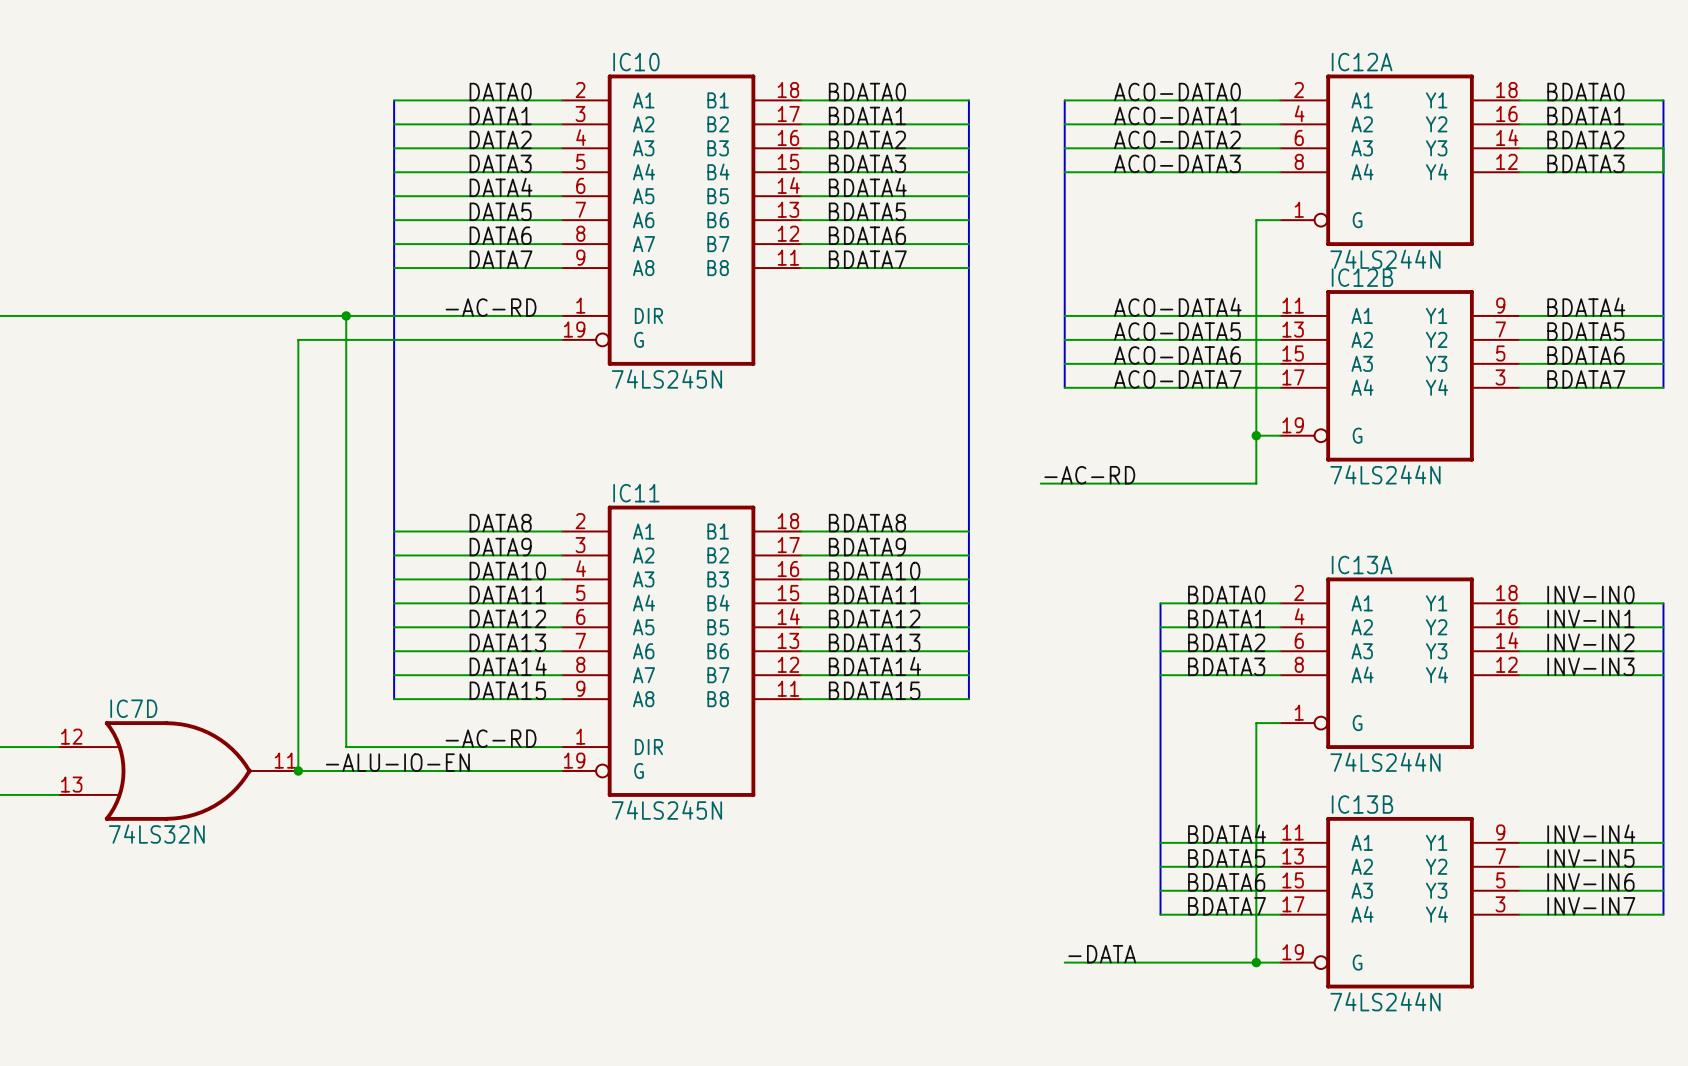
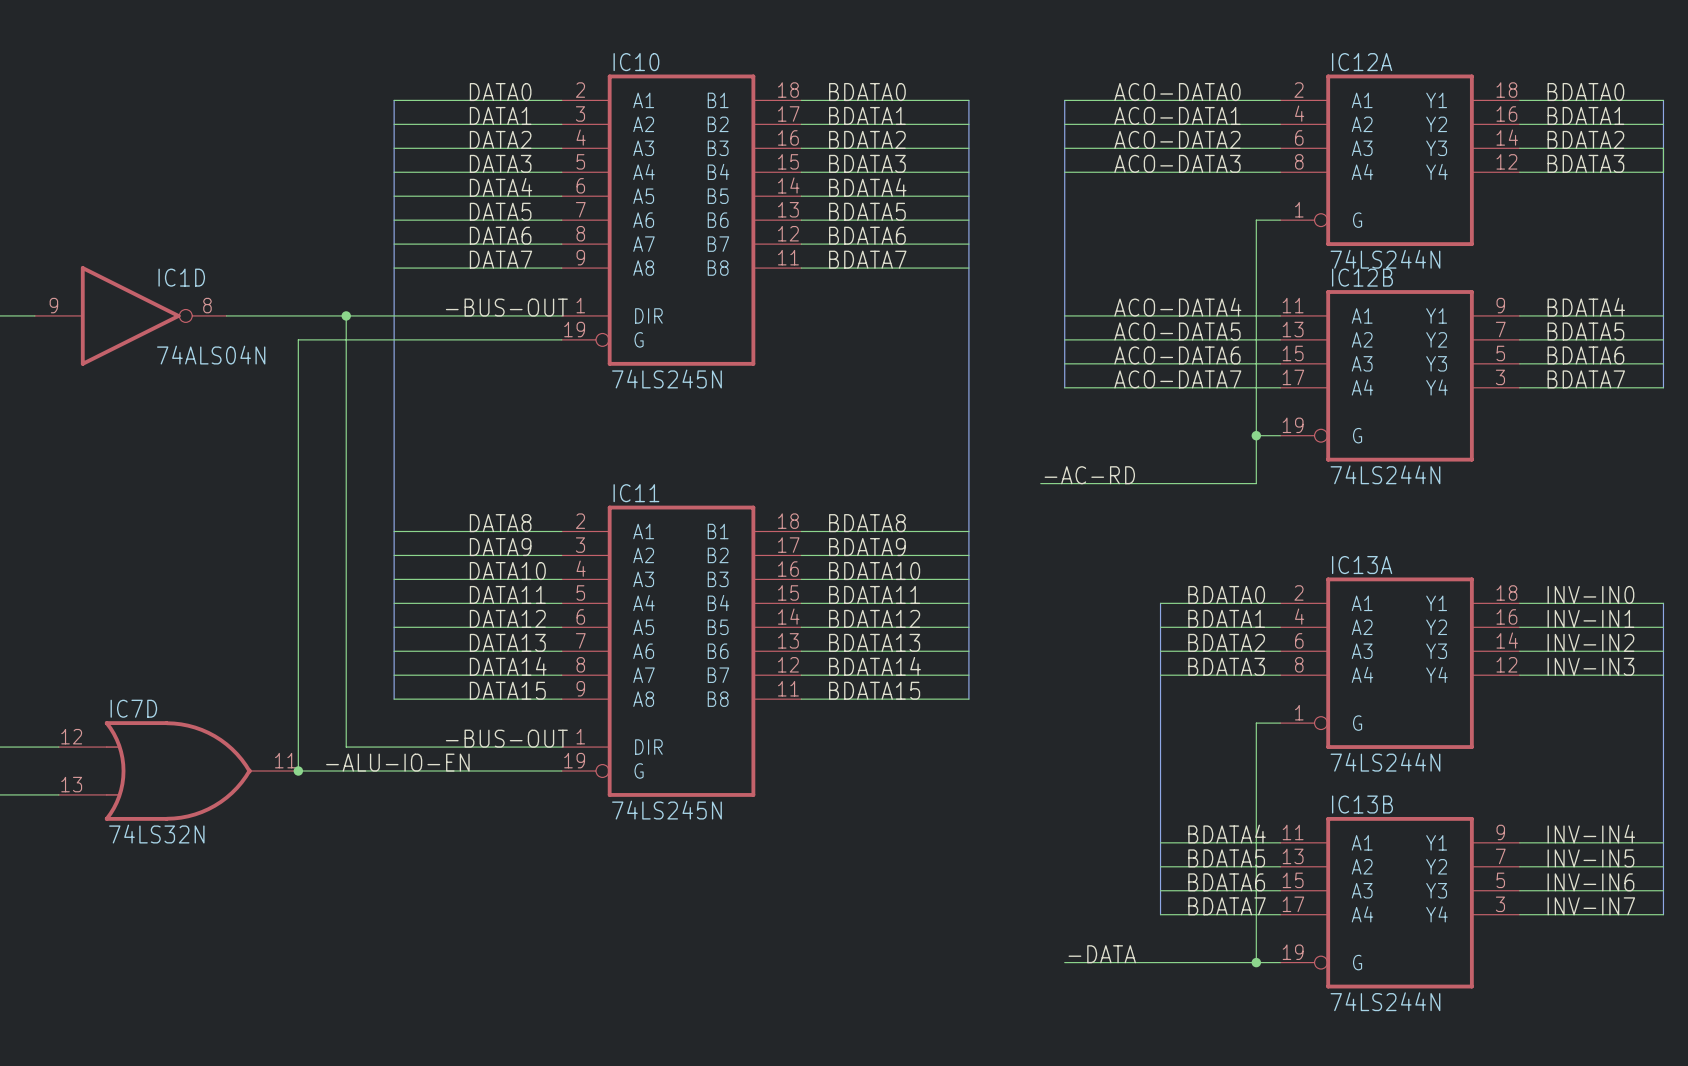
label: -AC-RD (491, 307) -> -BUS-OUT (506, 307)
wire: (34, 315) (226, 315) -> none
IC1D: none -> 74ALS04N (130, 315)
label: -AC-RD (491, 738) -> -BUS-OUT (506, 738)

